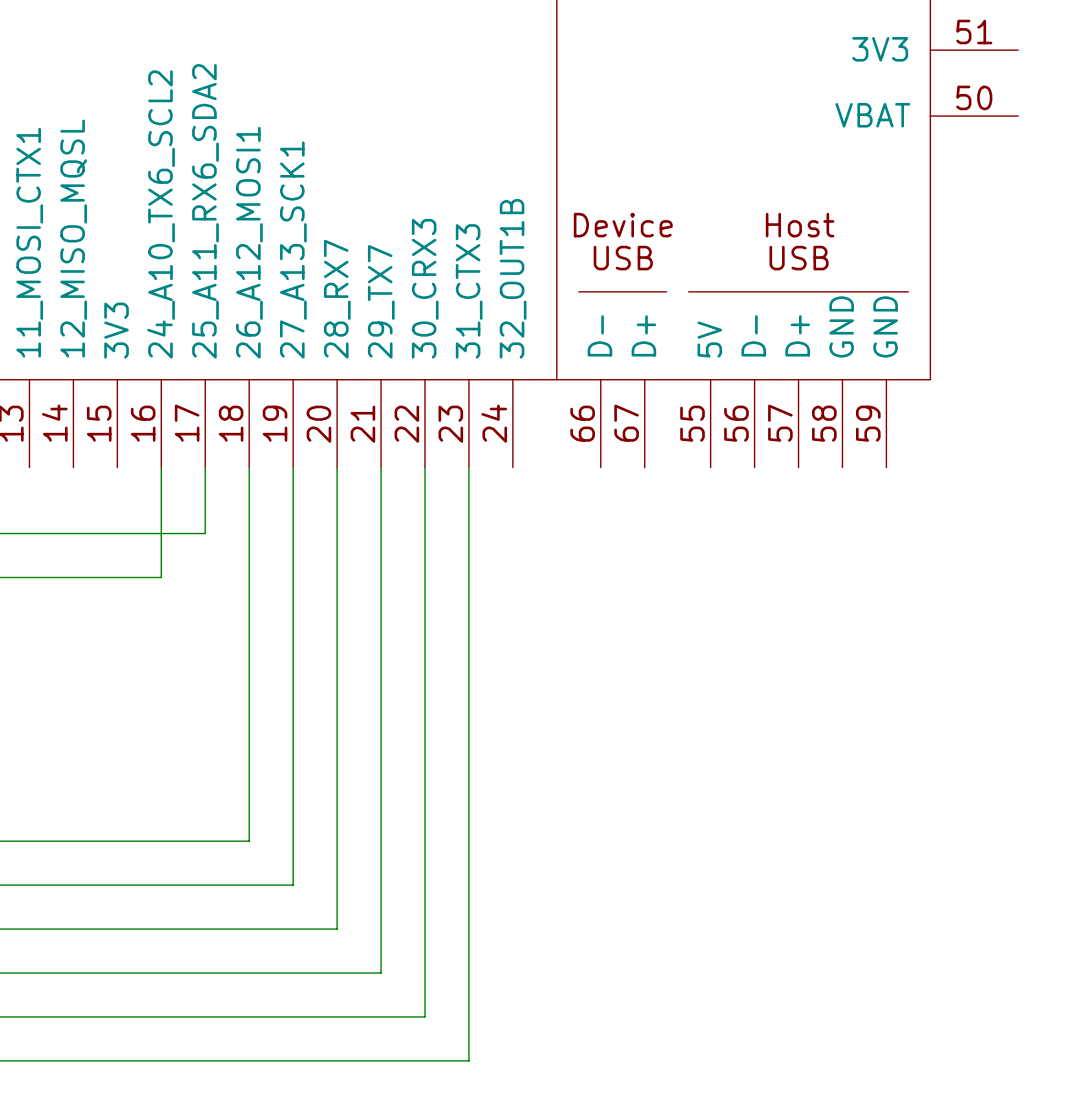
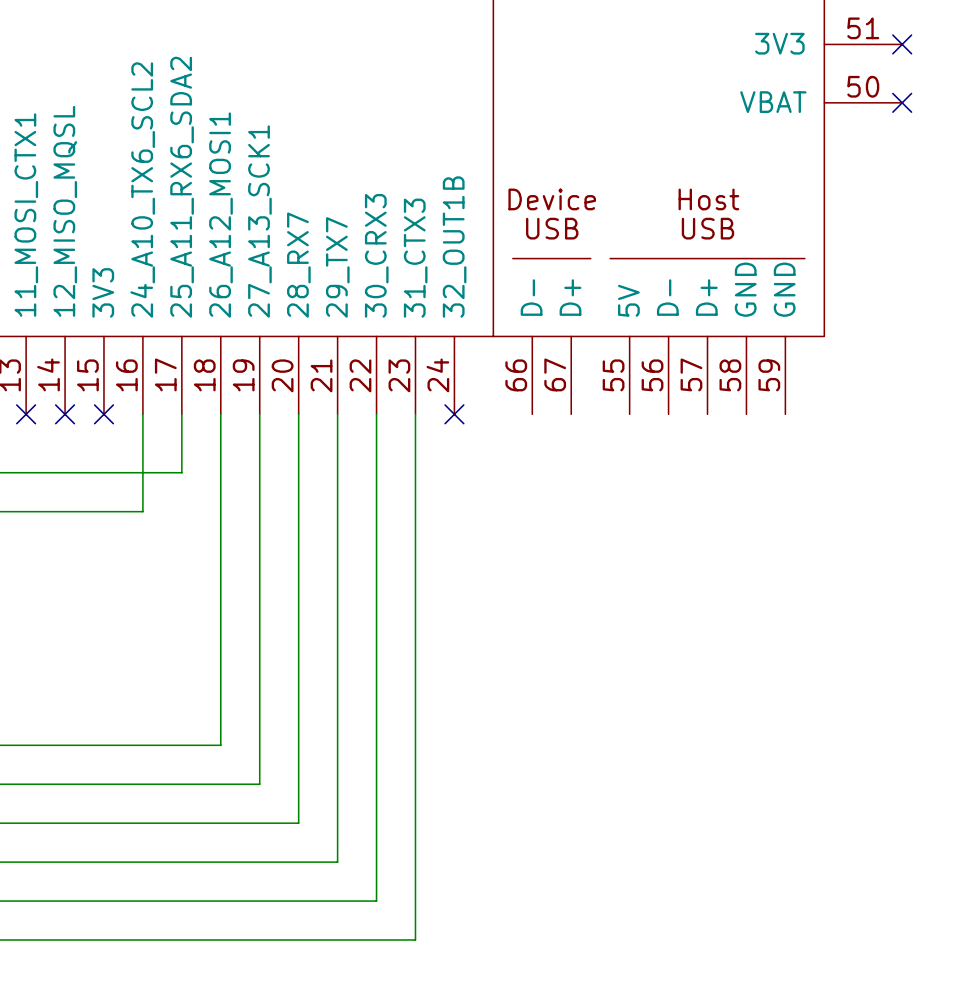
no-connect mark: none -> (902, 44)
no-connect mark: none -> (902, 102)
no-connect mark: none -> (26, 414)
no-connect mark: none -> (65, 414)
no-connect mark: none -> (103, 414)
no-connect mark: none -> (454, 414)

